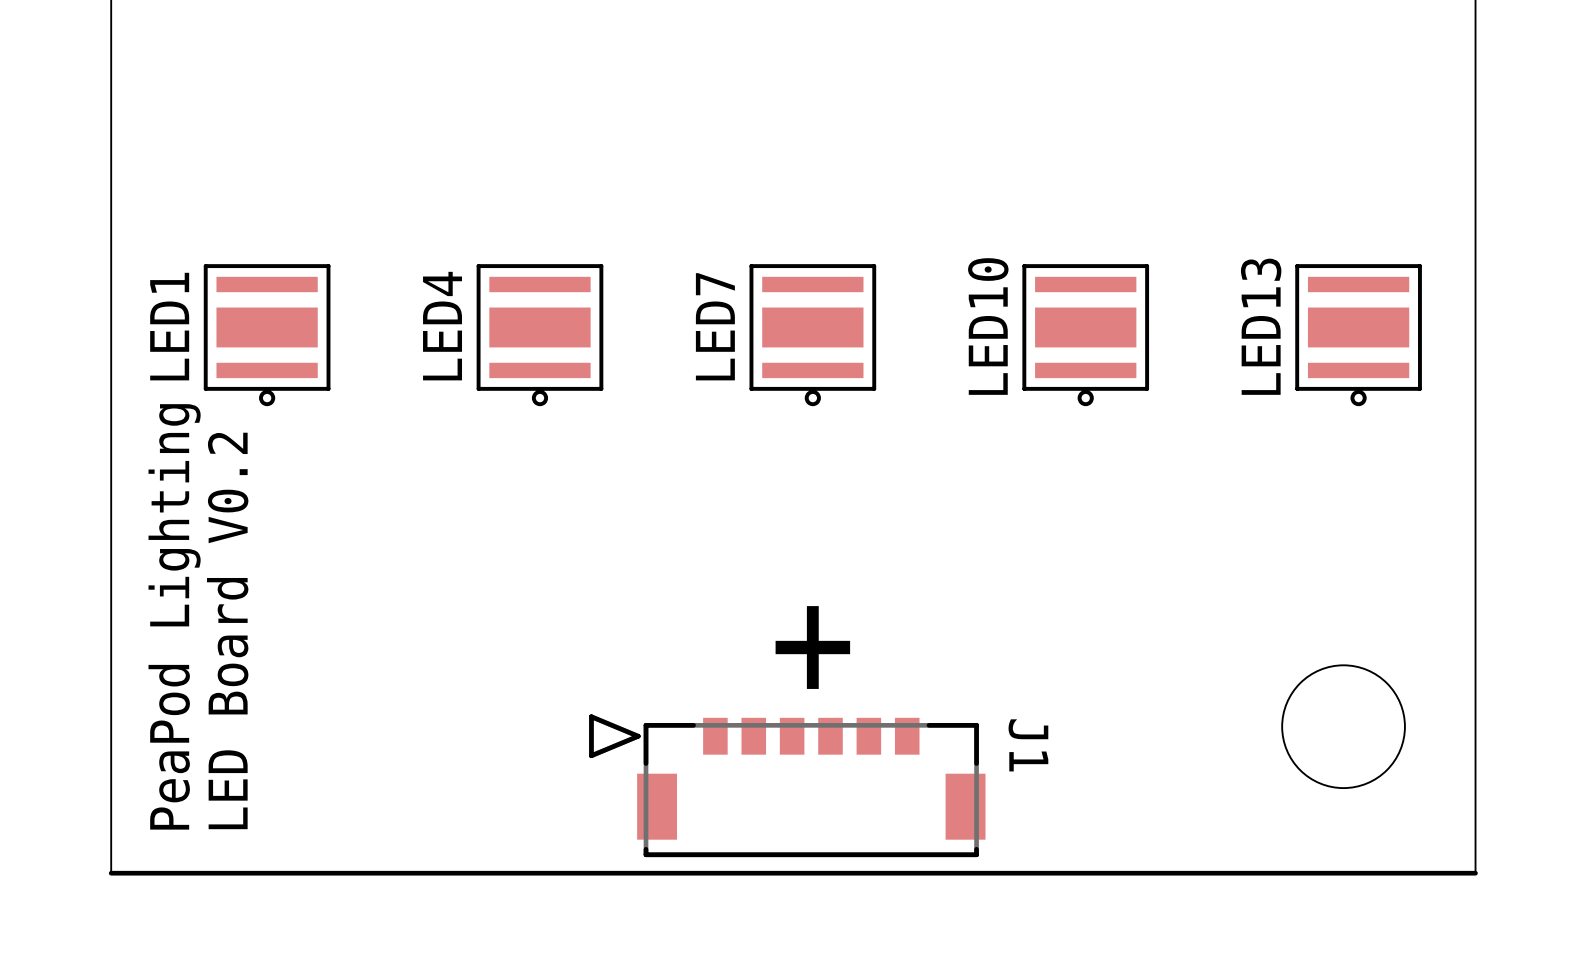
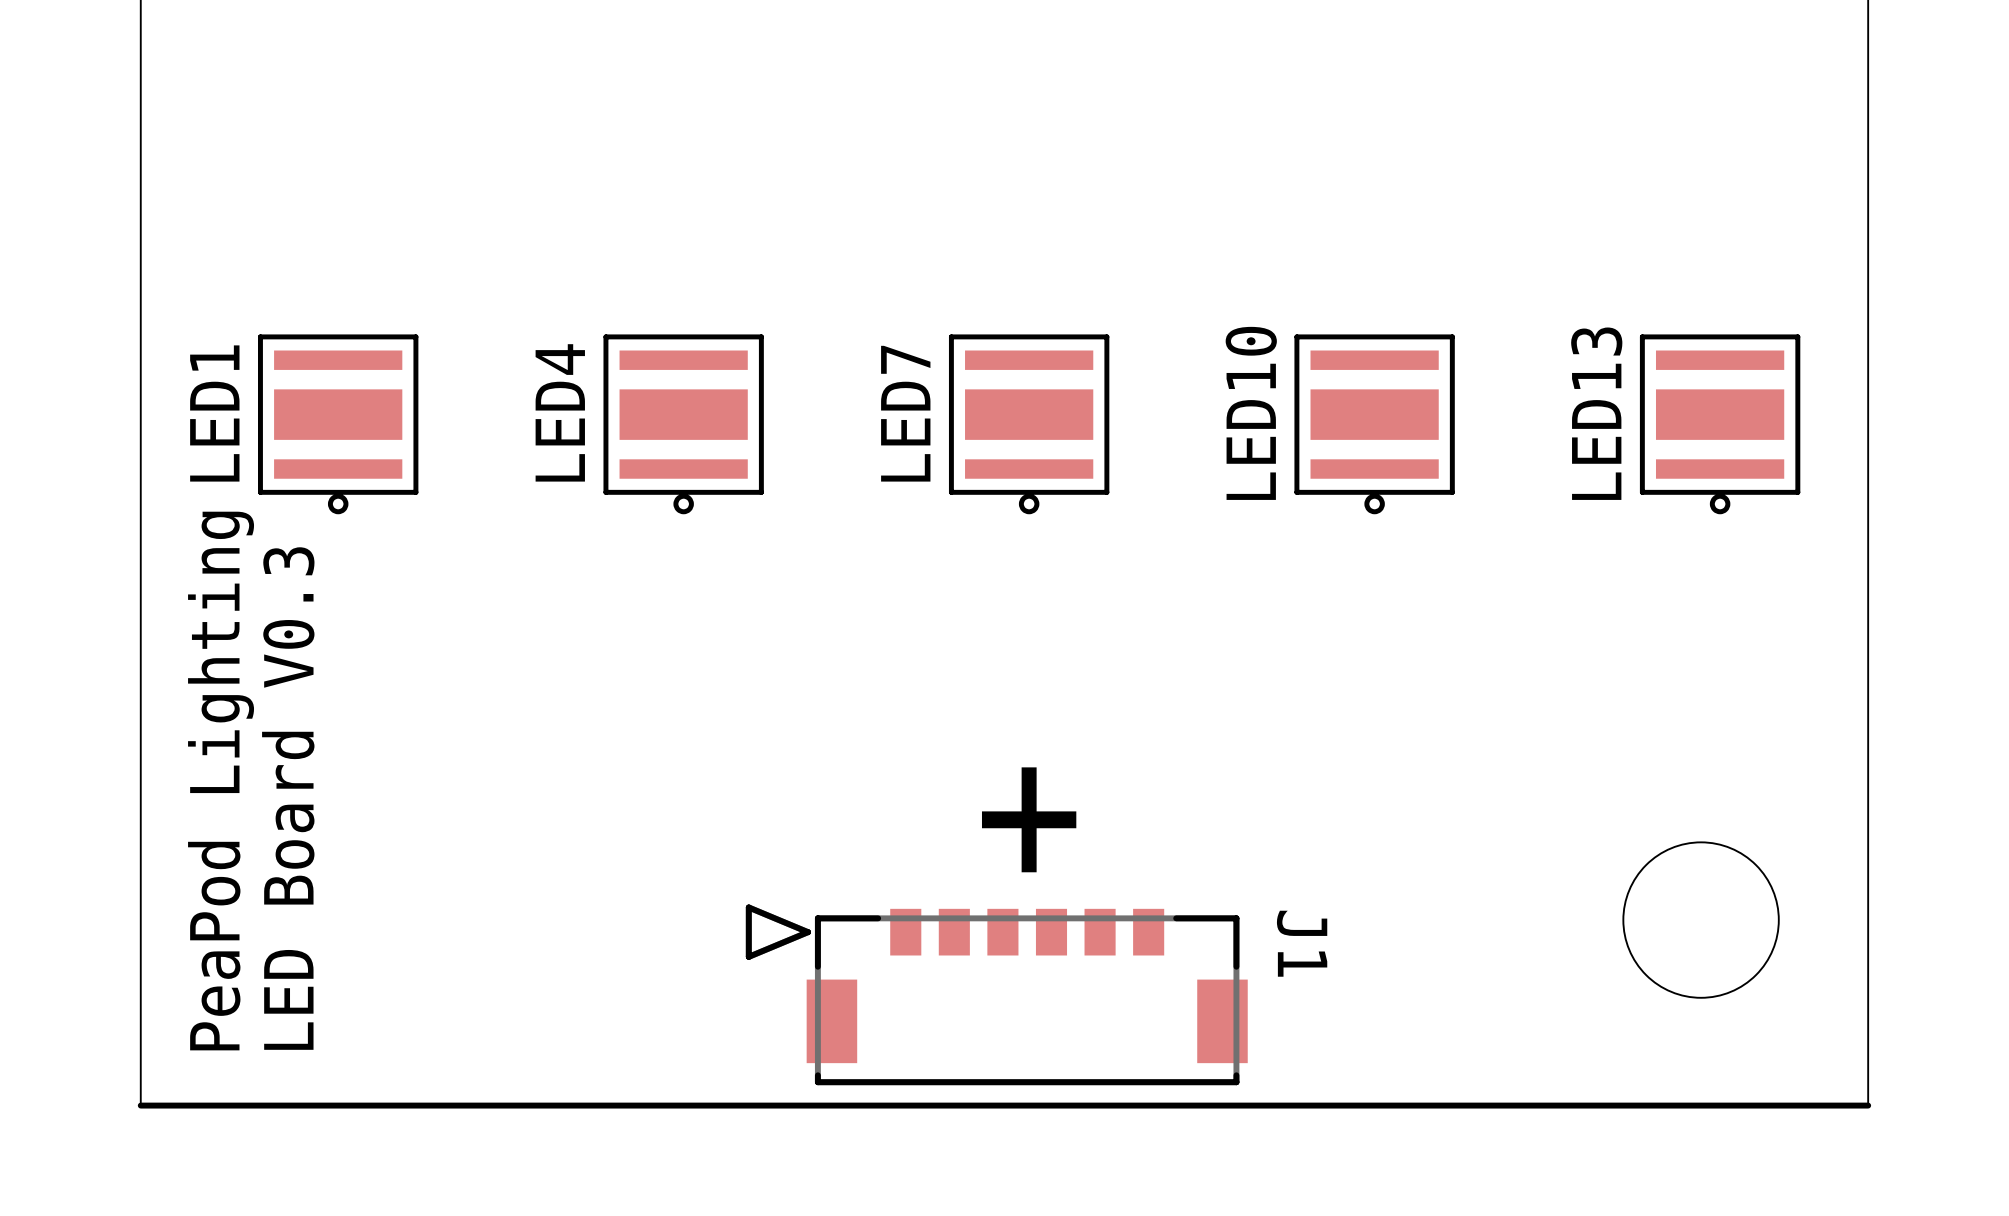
text: LED Board V0.2 (227, 630) -> LED Board V0.3 (288, 798)

